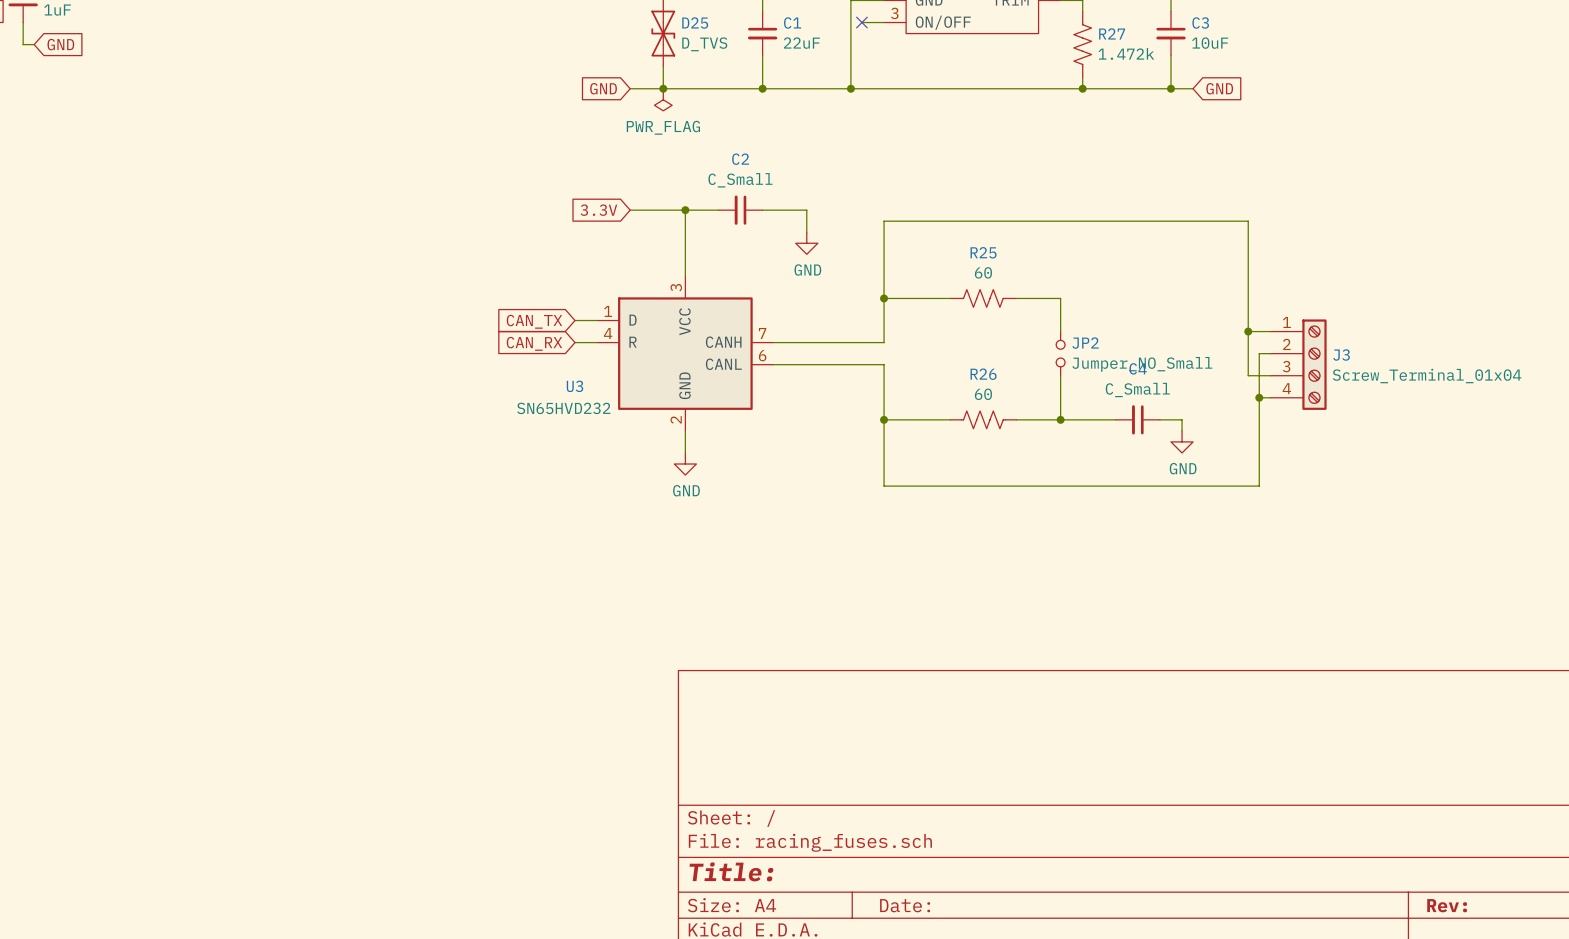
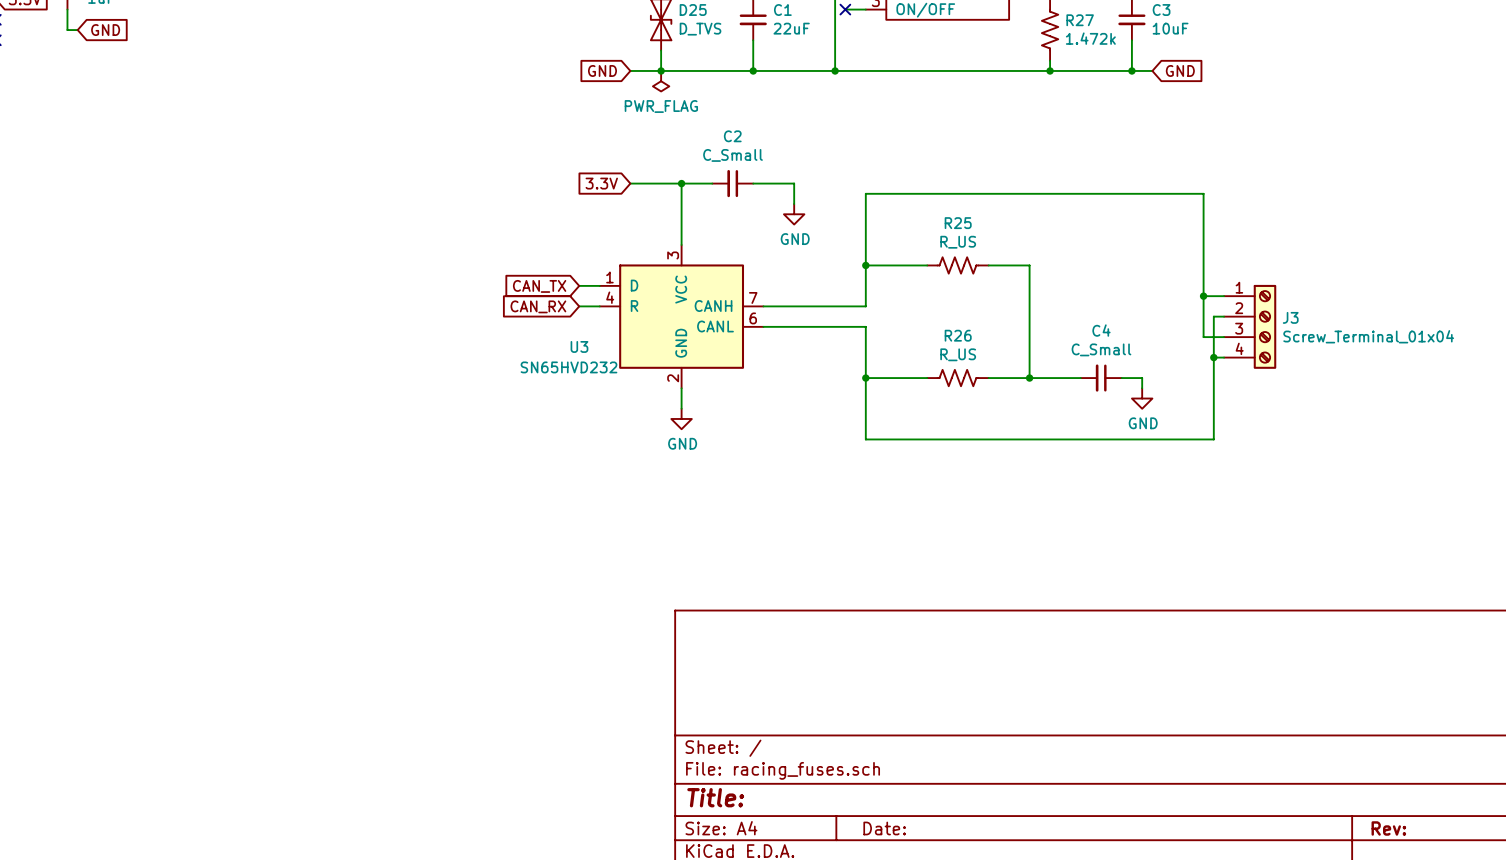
R25 value: 60 (983, 272) -> R_US (958, 242)
JP2: Jumper_NO_Small (1060, 353) -> none
R26 value: 60 (983, 394) -> R_US (958, 354)

